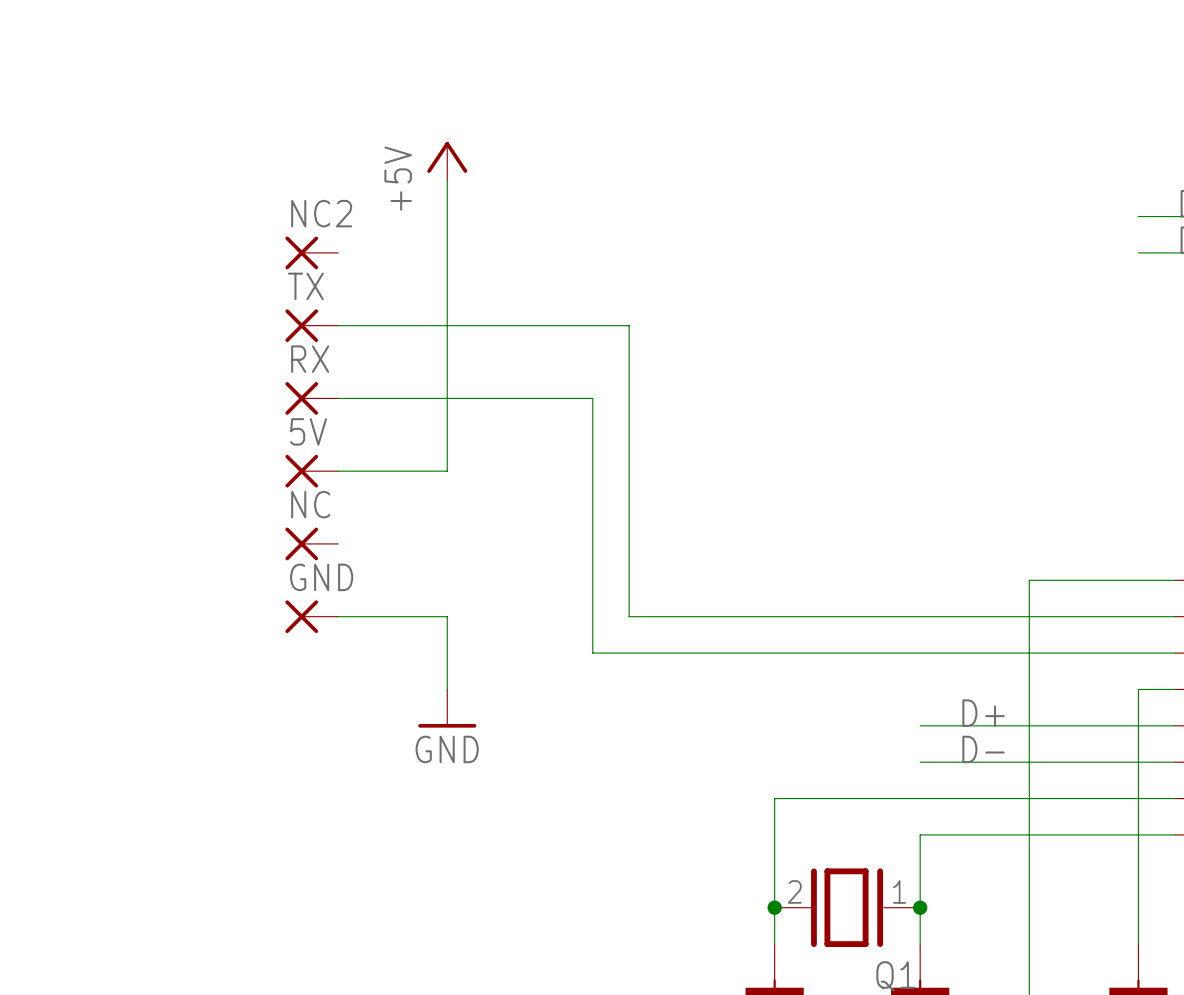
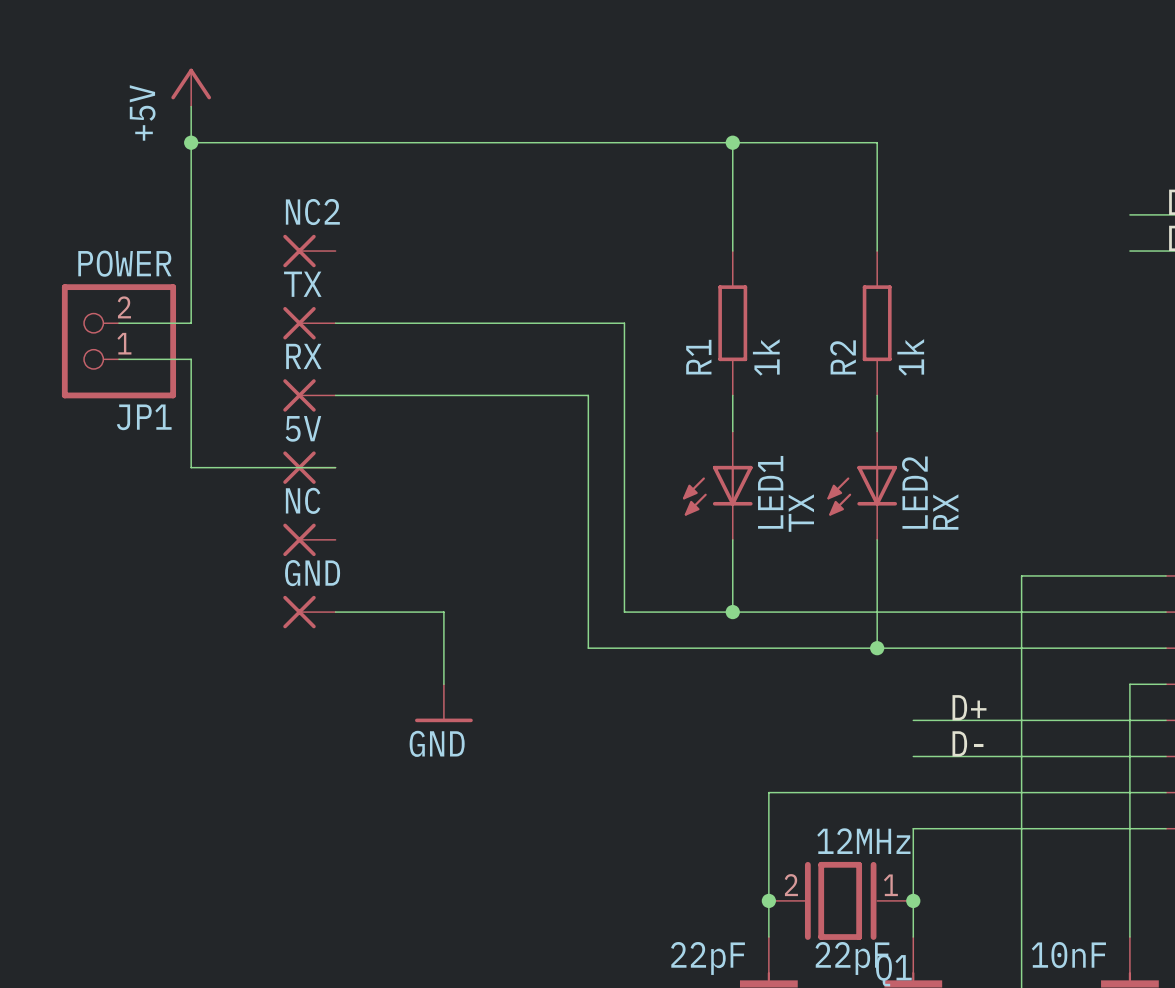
wire: none -> (191, 106) (191, 323) (118, 323)
wire: none -> (191, 142) (877, 142) (877, 251)
junction: none -> (191, 142)
wire: none -> (732, 142) (732, 251)
junction: none -> (732, 142)
power symbol position: +5V (447, 161) -> +5V (191, 87)
wire: (447, 180) (447, 471) (338, 471) -> (118, 359) (191, 359) (191, 467) (335, 467)
R1: none -> 1k (732, 323)
R2: none -> 1k (877, 323)
JP1: none -> POWER (118, 341)
wire: none -> (732, 395) (732, 431)
wire: none -> (877, 395) (877, 431)
LED1: none -> TX (717, 485)
LED2: none -> RX (862, 485)
wire: none -> (732, 539) (732, 612)
wire: none -> (877, 539) (877, 648)
junction: none -> (732, 612)
junction: none -> (877, 648)
Q1 value: none -> 12MHz (863, 841)
part value: none -> 10nF (1068, 955)
part value: none -> 22pF (708, 958)
part value: none -> 22pF (852, 958)

